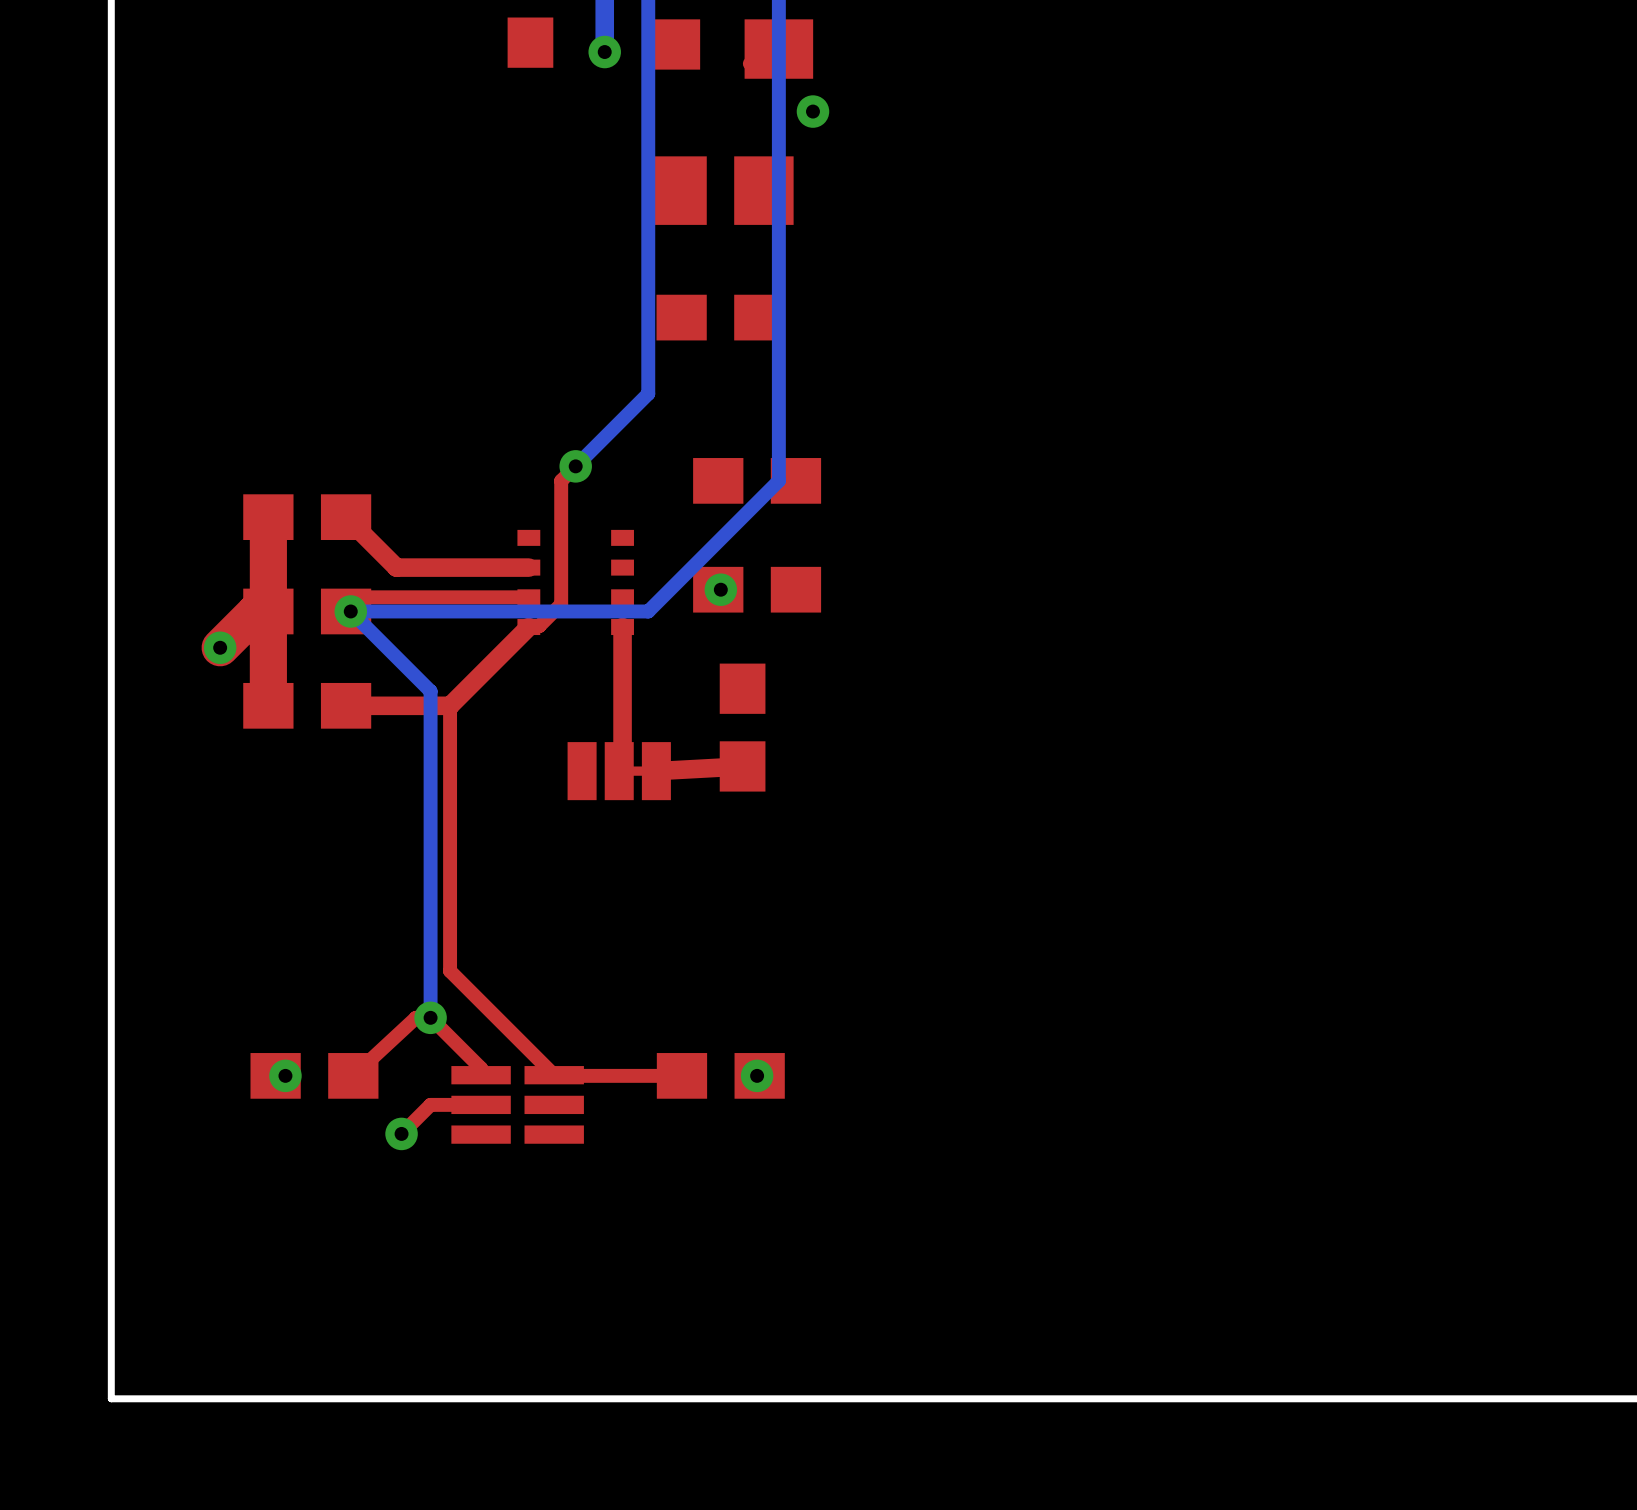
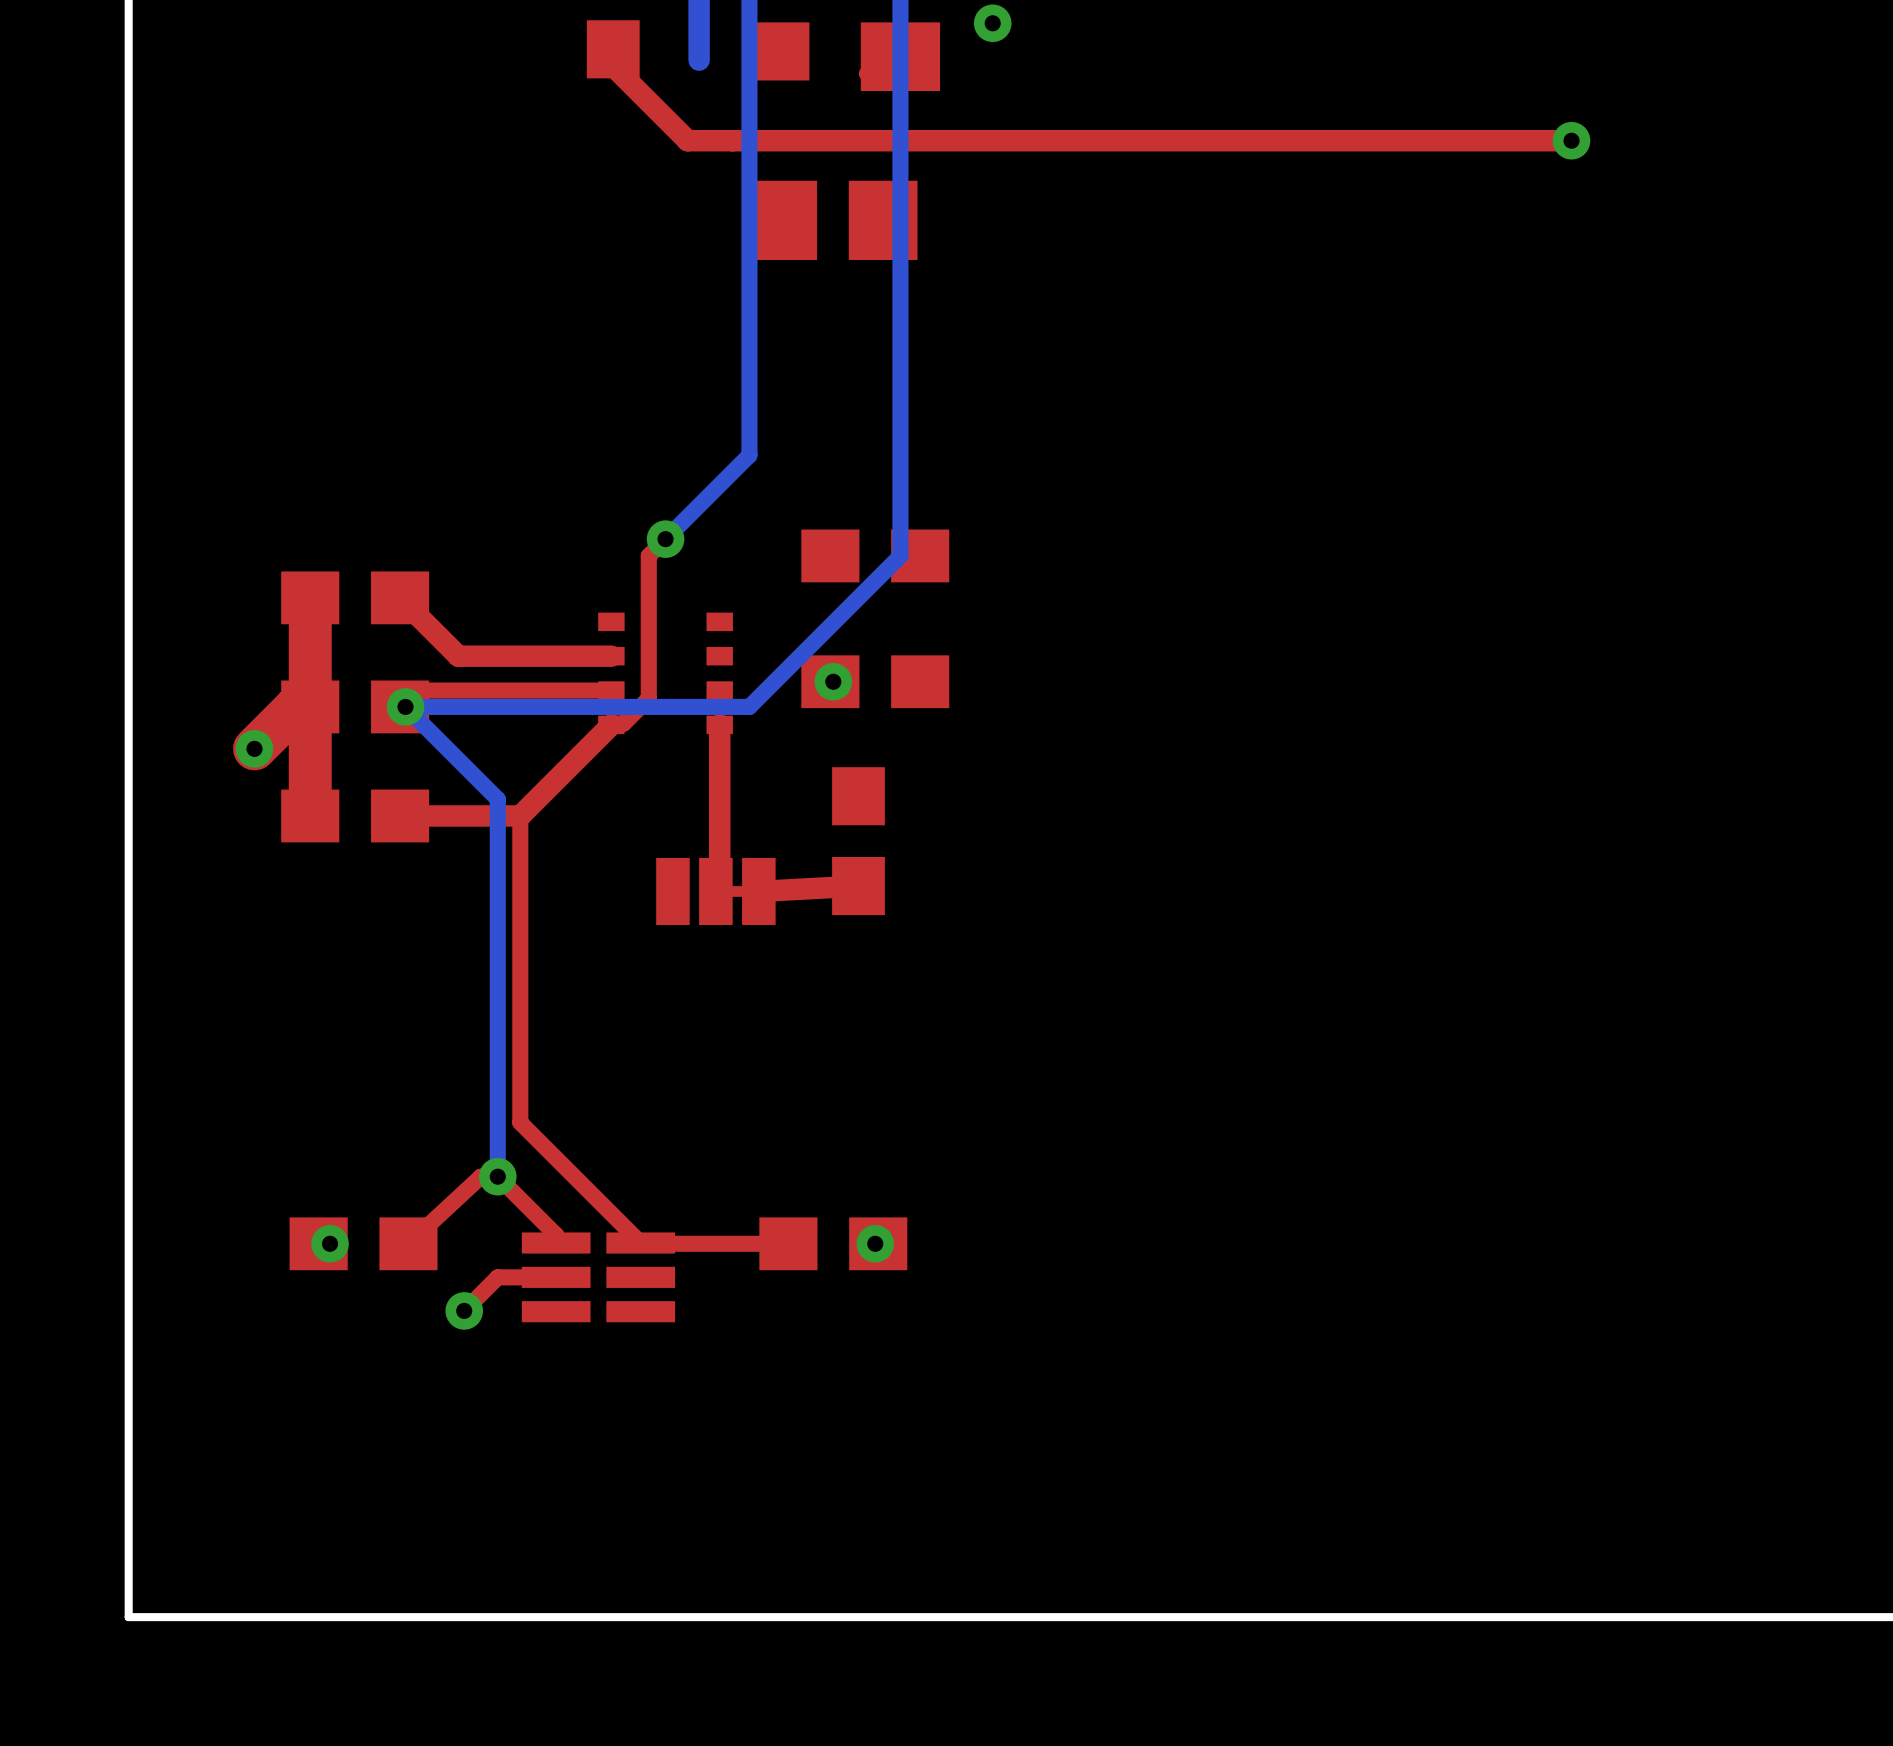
via: none -> (992, 23)
top track: none -> (598, 51) (687, 140) (1571, 140)
via: (604, 52) -> none
via: (812, 111) -> none
via: none -> (1571, 140)
part: (720, 317) -> none

